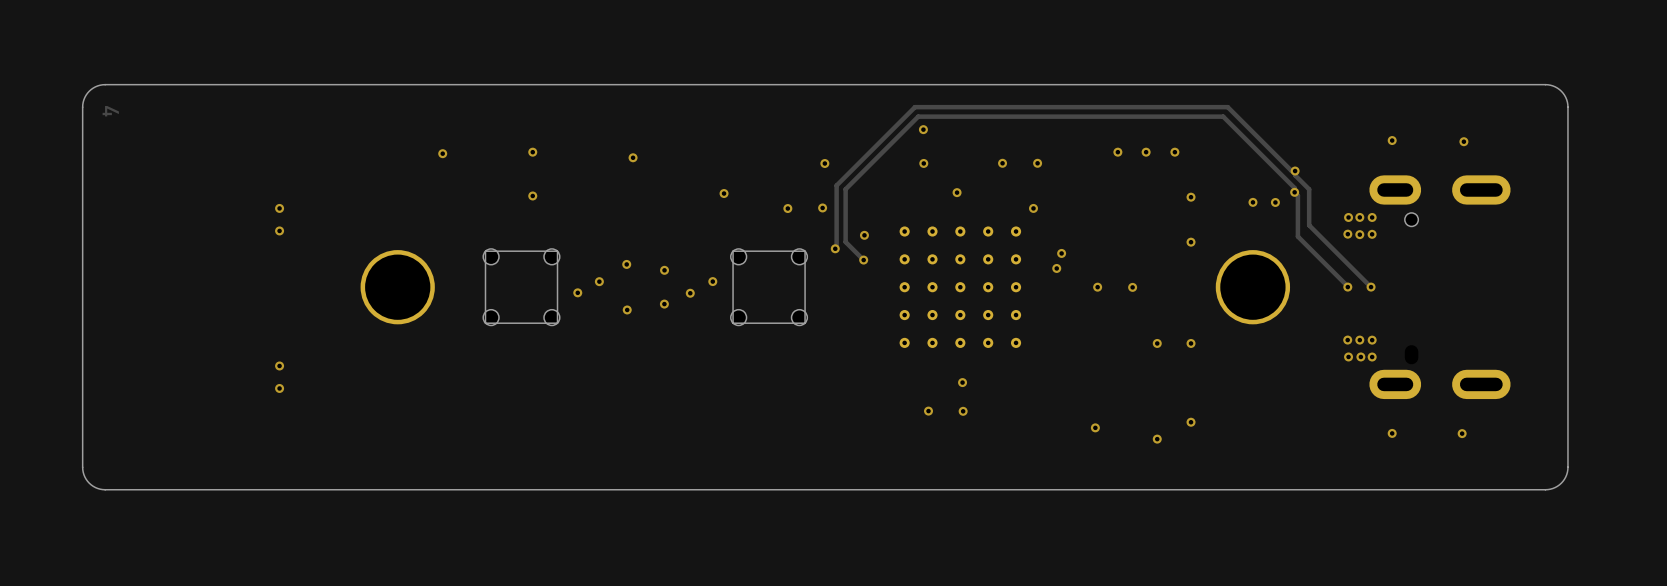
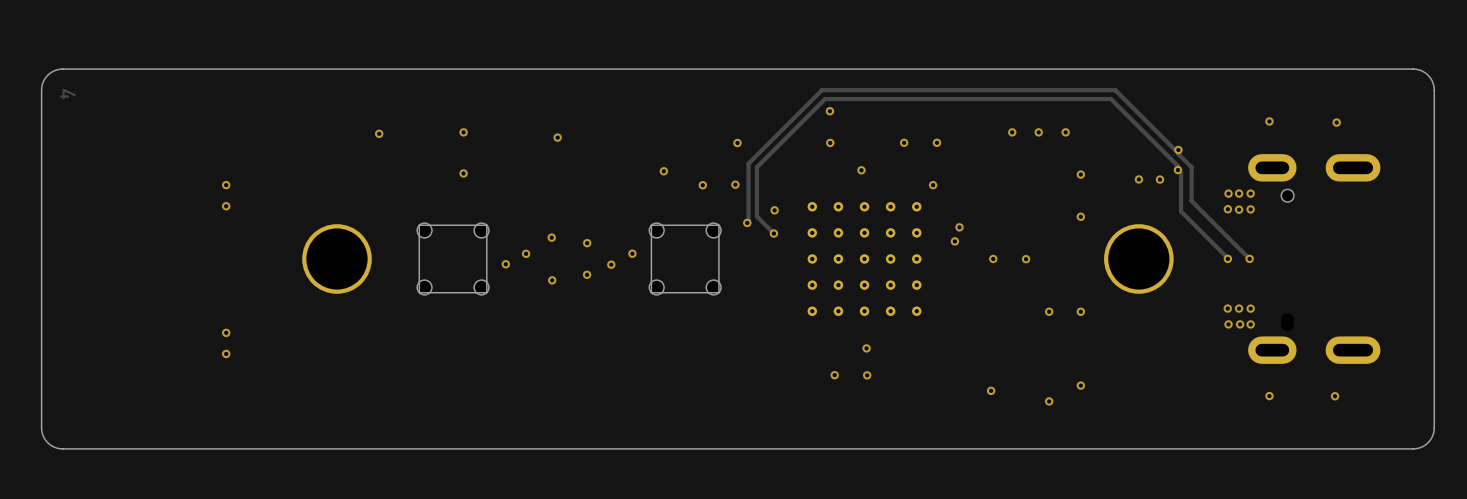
via position: (724, 193) -> (663, 171)

